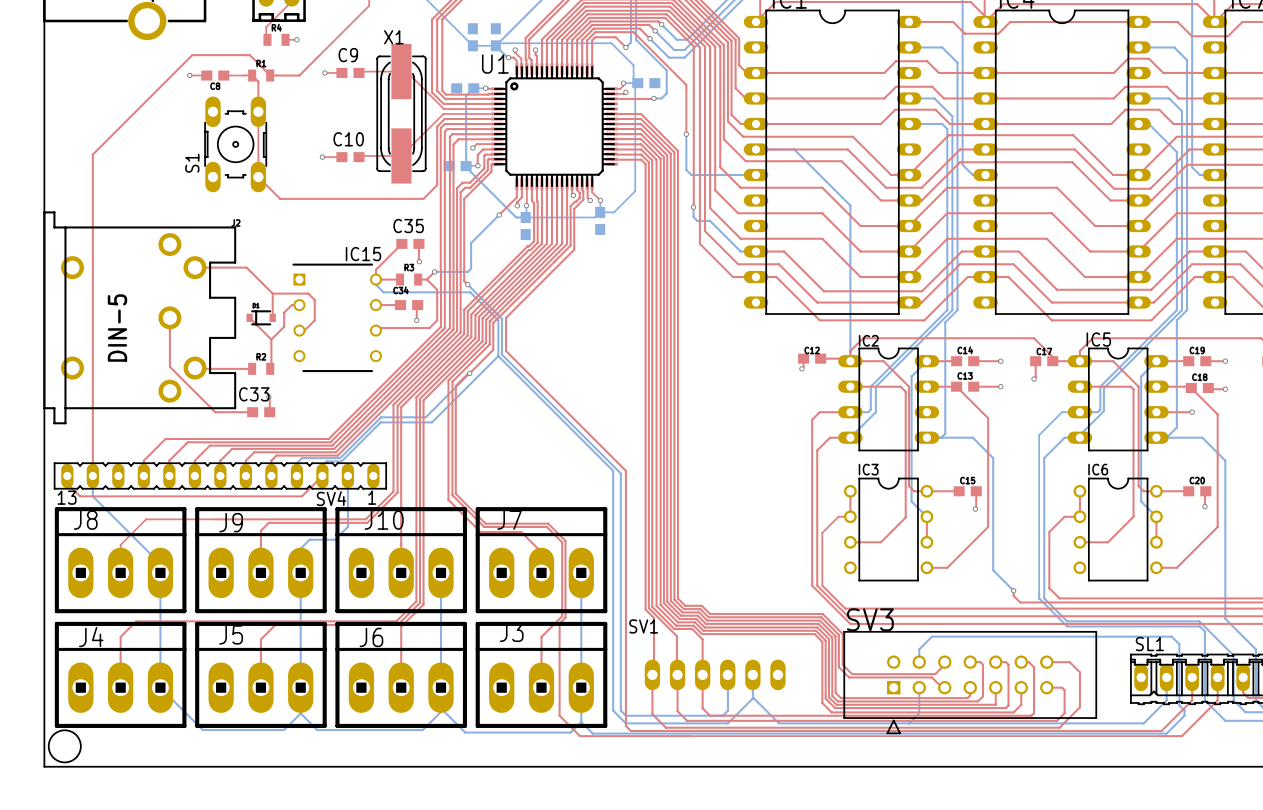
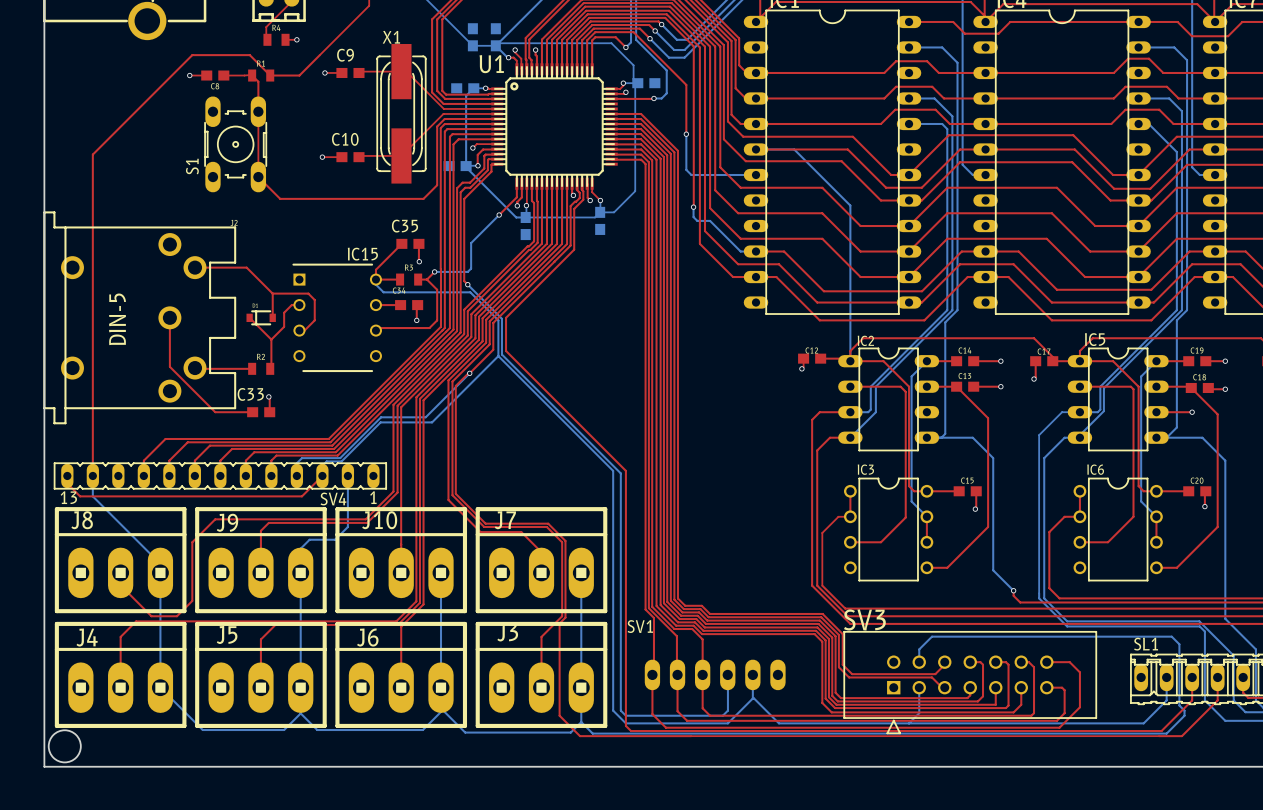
top track: (215, 519) (146, 519) (120, 544) (120, 572) -> (215, 519) (192, 542) (192, 600) (177, 616) (151, 616) (120, 585) (120, 572)

